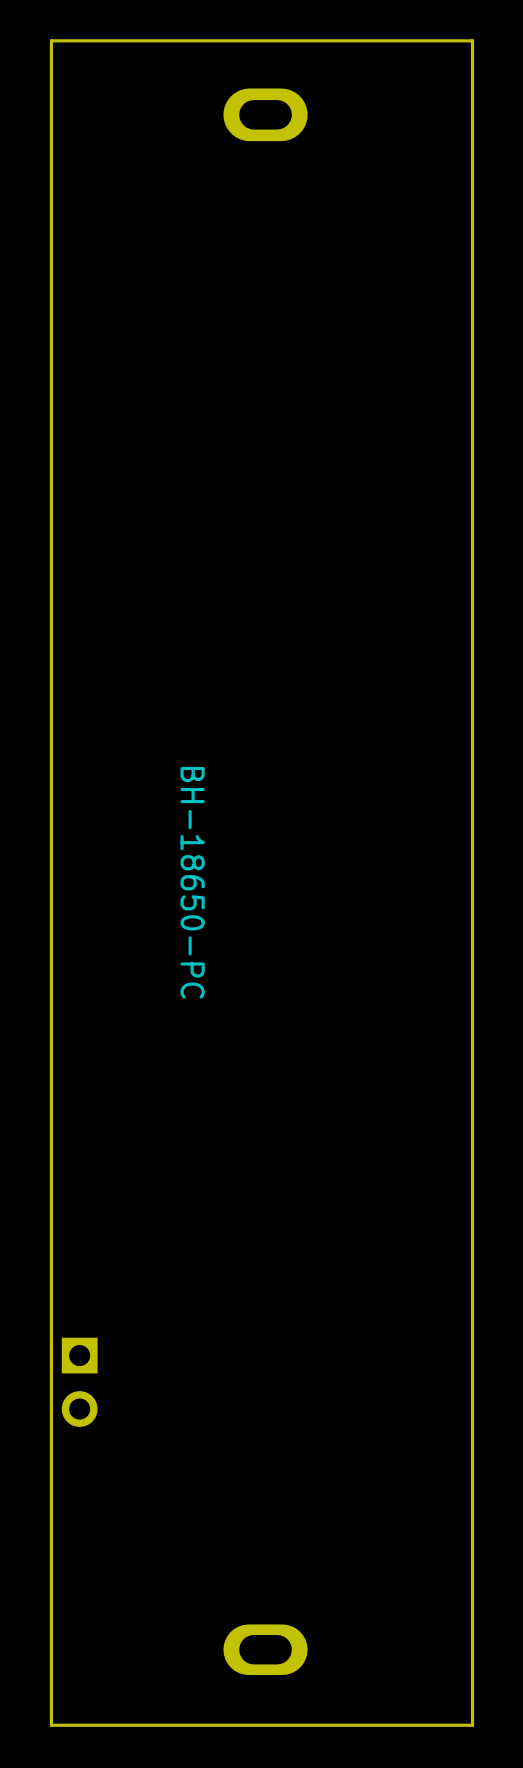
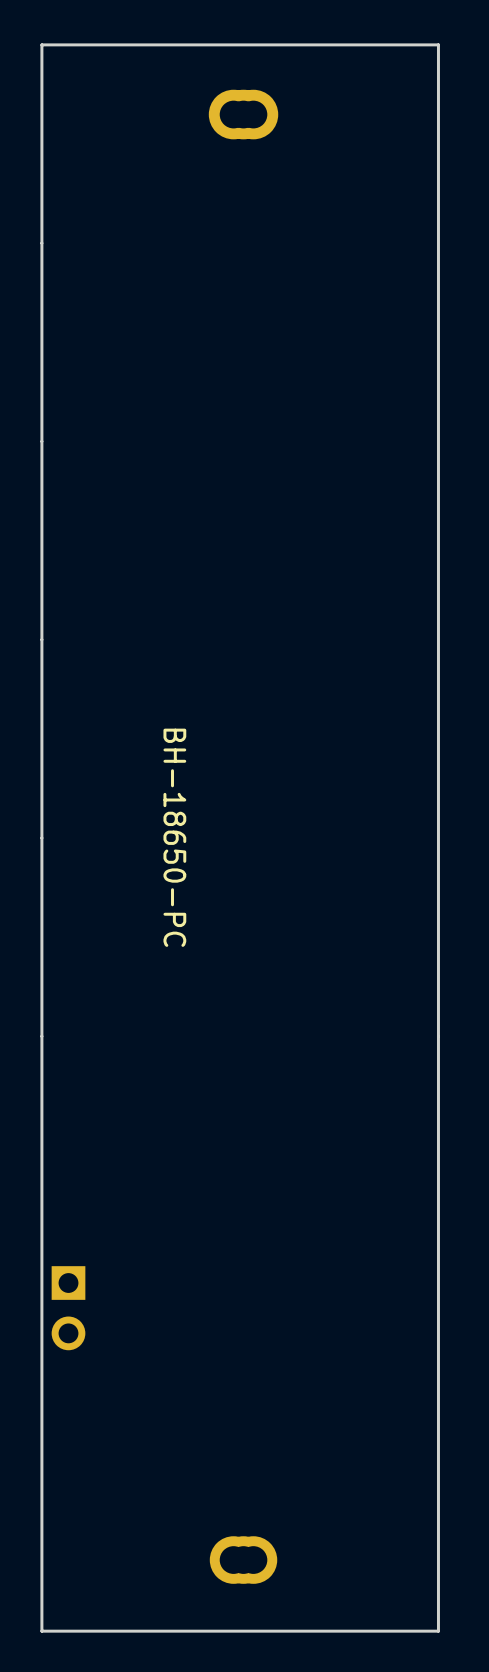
part footprint: [223, 88, 308, 1675] -> [208, 89, 279, 1584]

